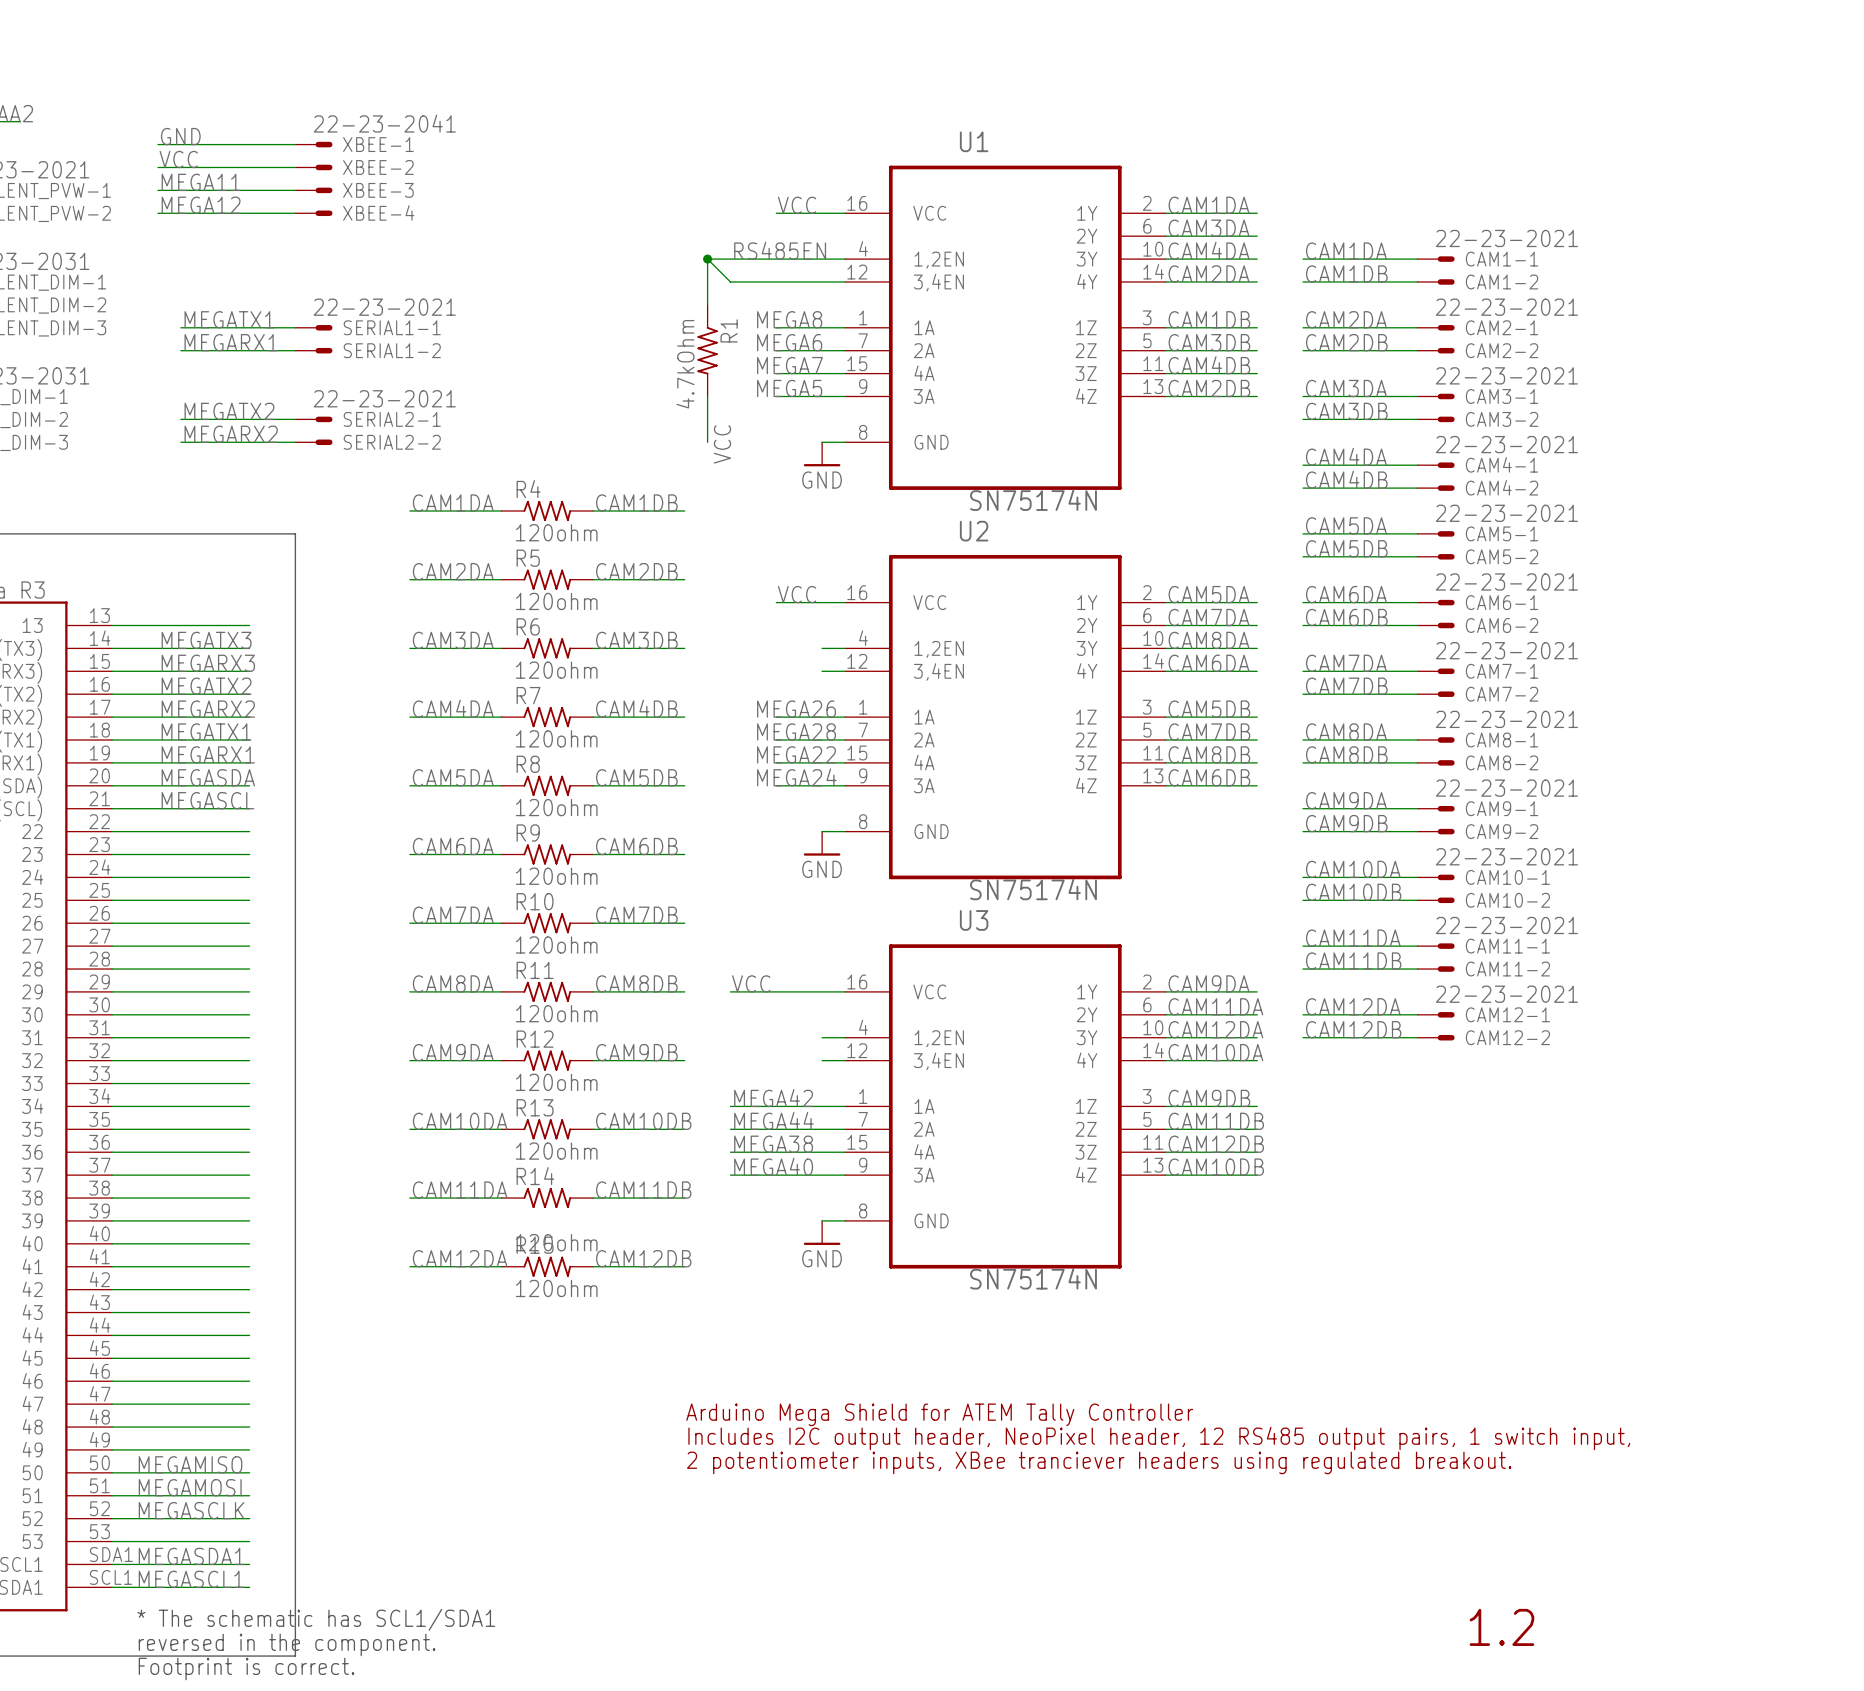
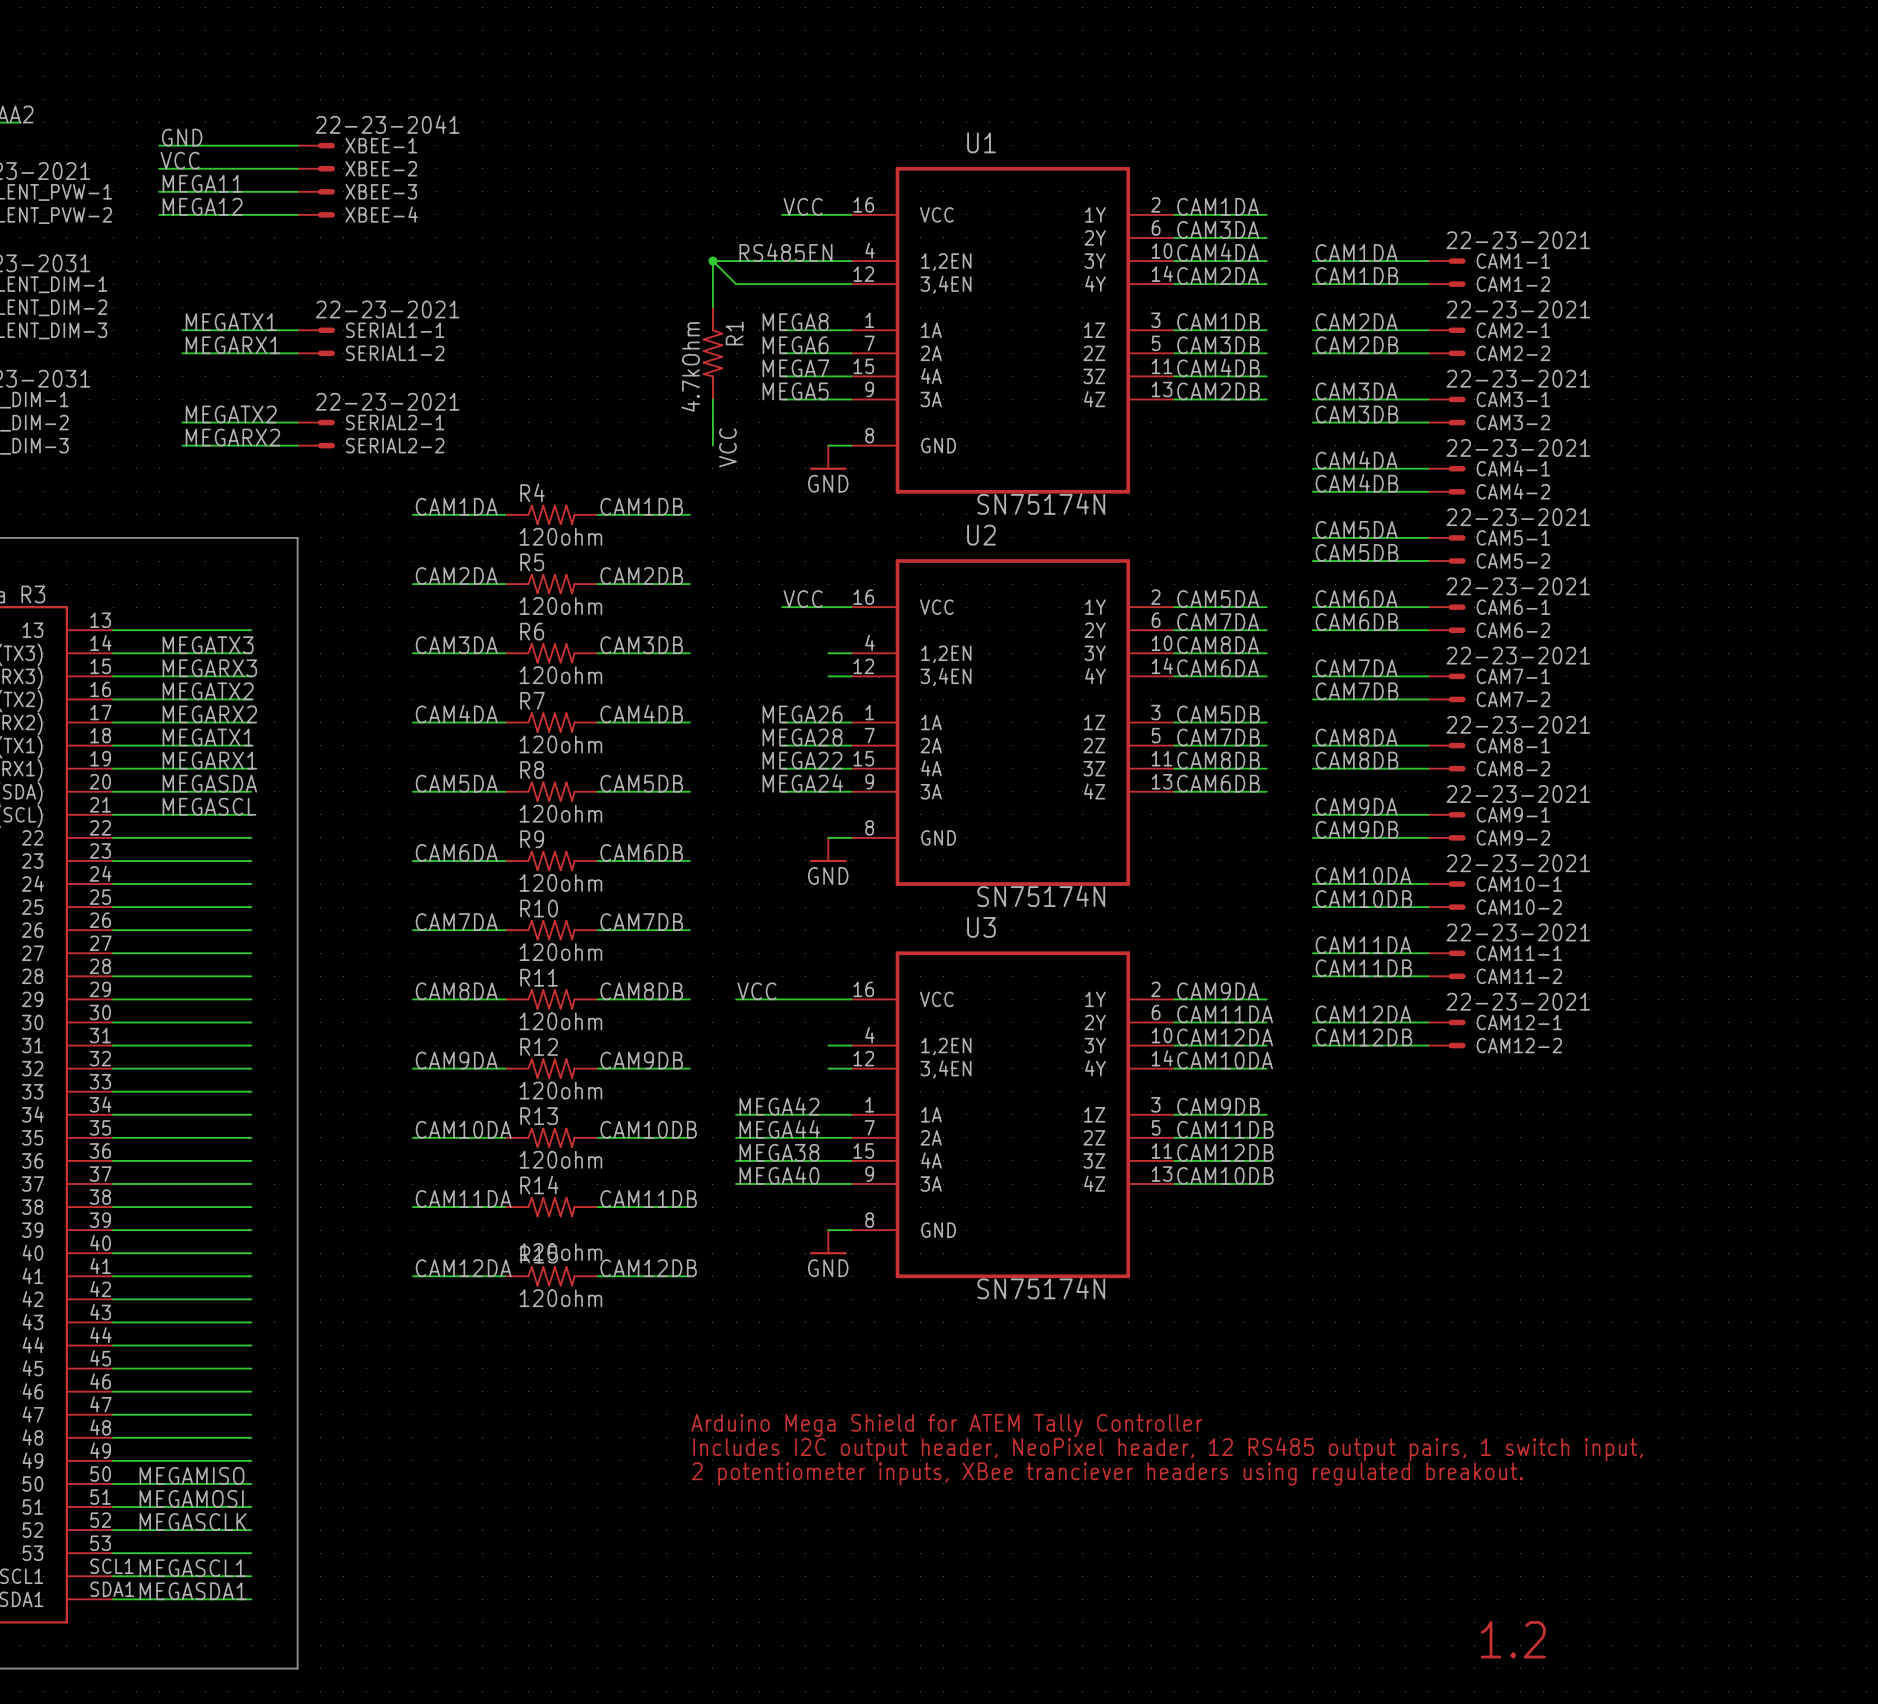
part pin number: SDA1 (111, 1554) -> SCL1 (111, 1566)
label: MEGASDA1 (191, 1556) -> MEGASCL1 (192, 1568)
part pin number: SCL1 (111, 1577) -> SDA1 (112, 1589)
label: MEGASCL1 (191, 1579) -> MEGASDA1 (193, 1591)
text: * The schematic has SCL1/SDA1 (316, 1619) -> none
text: reversed in the component. (287, 1644) -> none
text: Footprint is correct. (246, 1669) -> none

